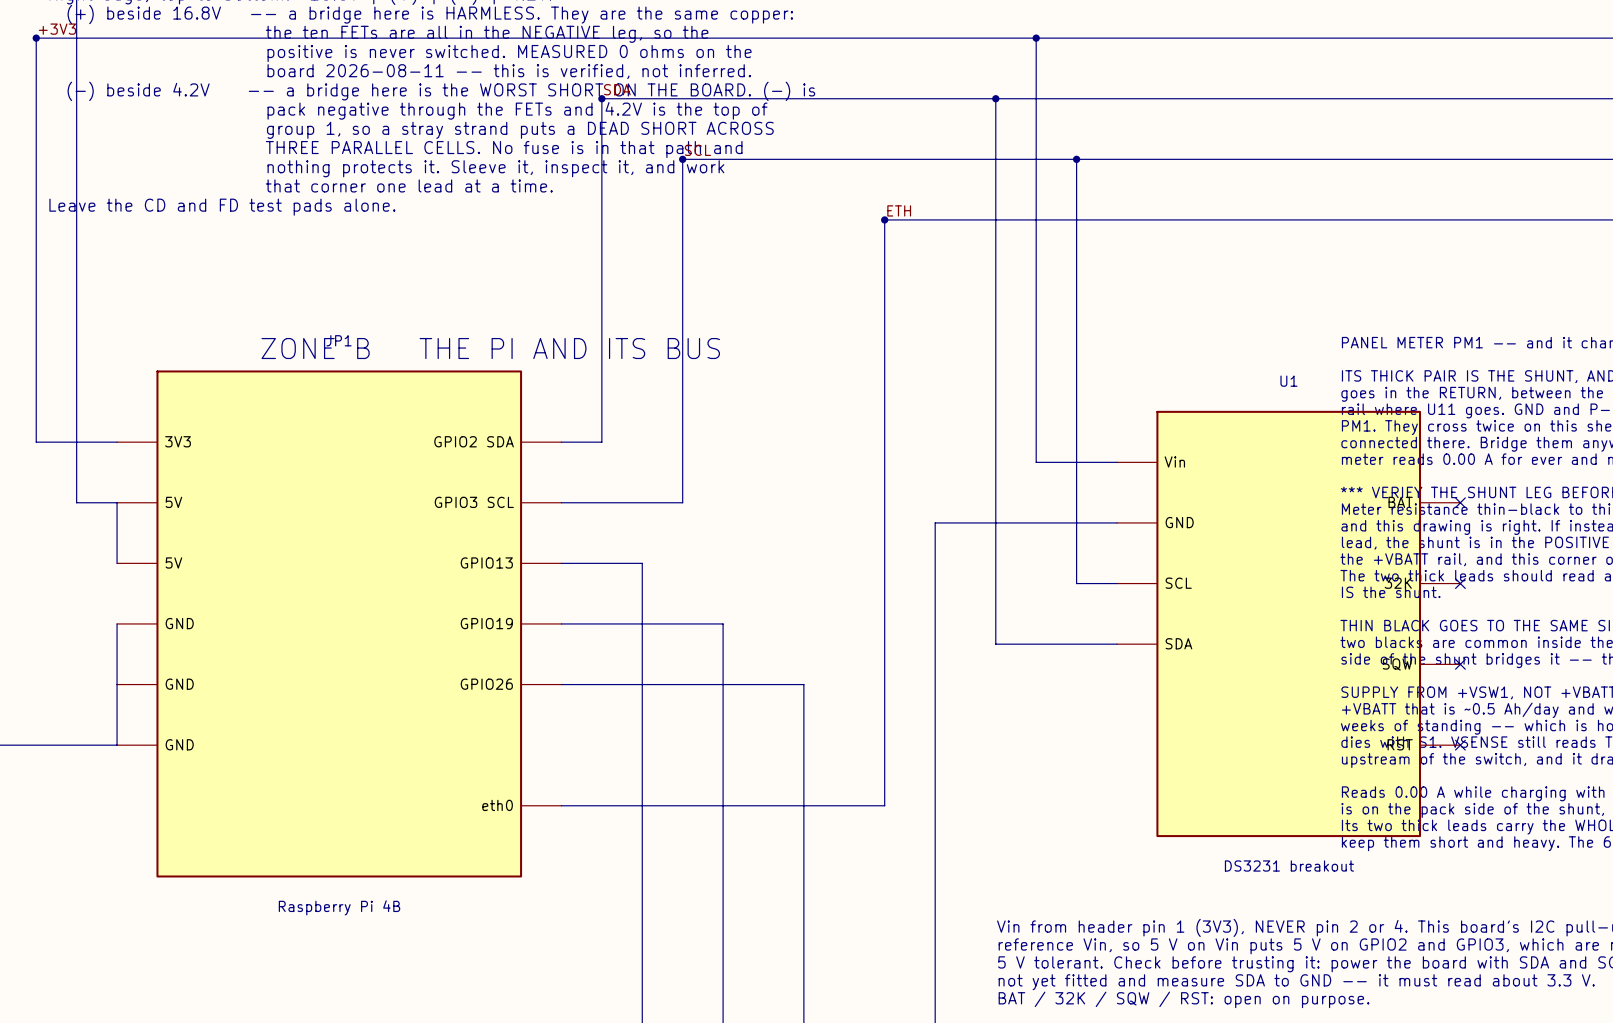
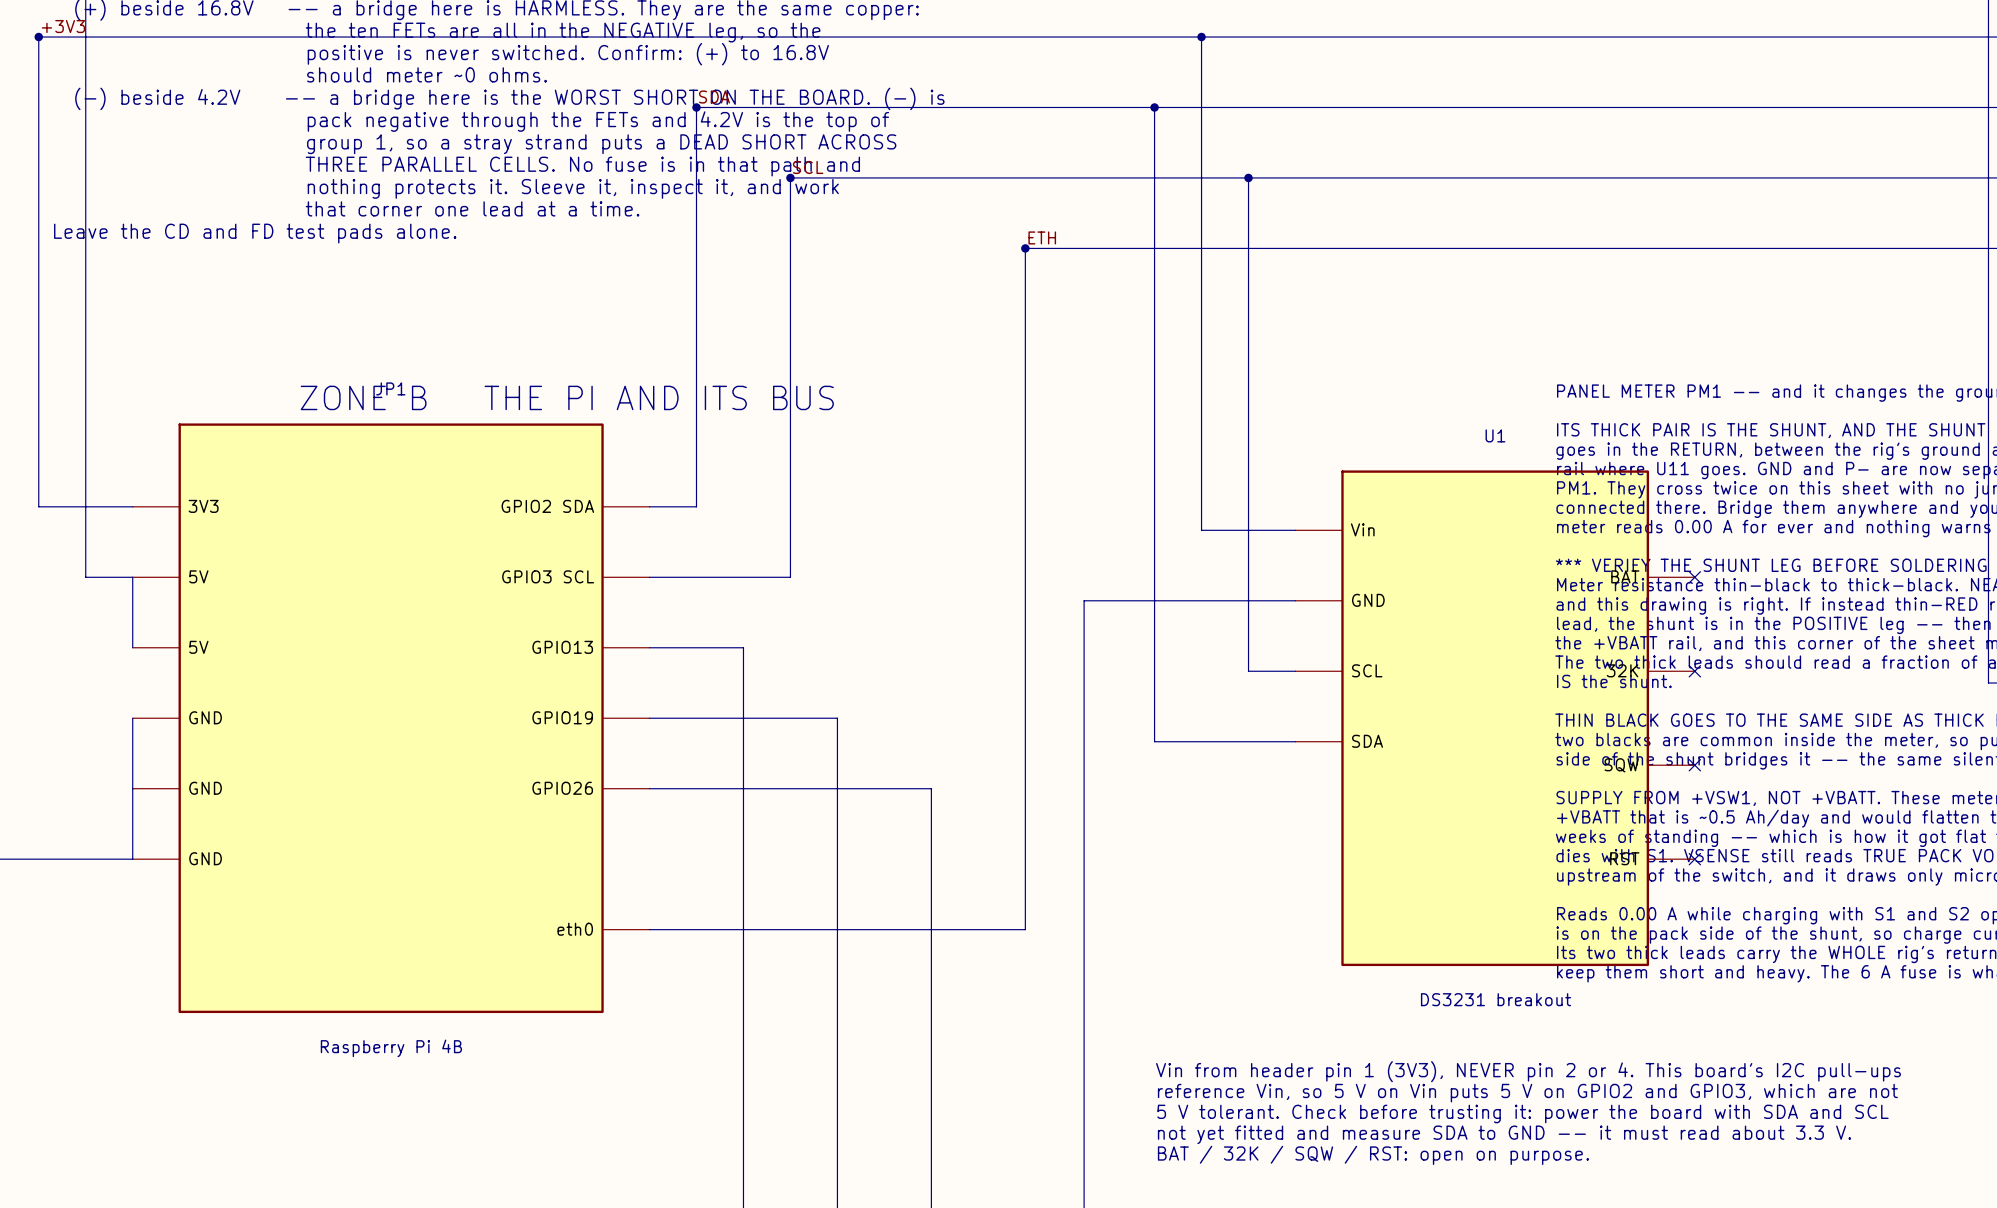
text: positive is never switched. MEASURED 0 ohms on the (509, 53) -> positive is never switched. Confirm: (+) to 16.8V (568, 54)
text: board 2026-08-11 -- this is verified, not inferred. (509, 71) -> should meter ~0 ohms. (426, 74)

